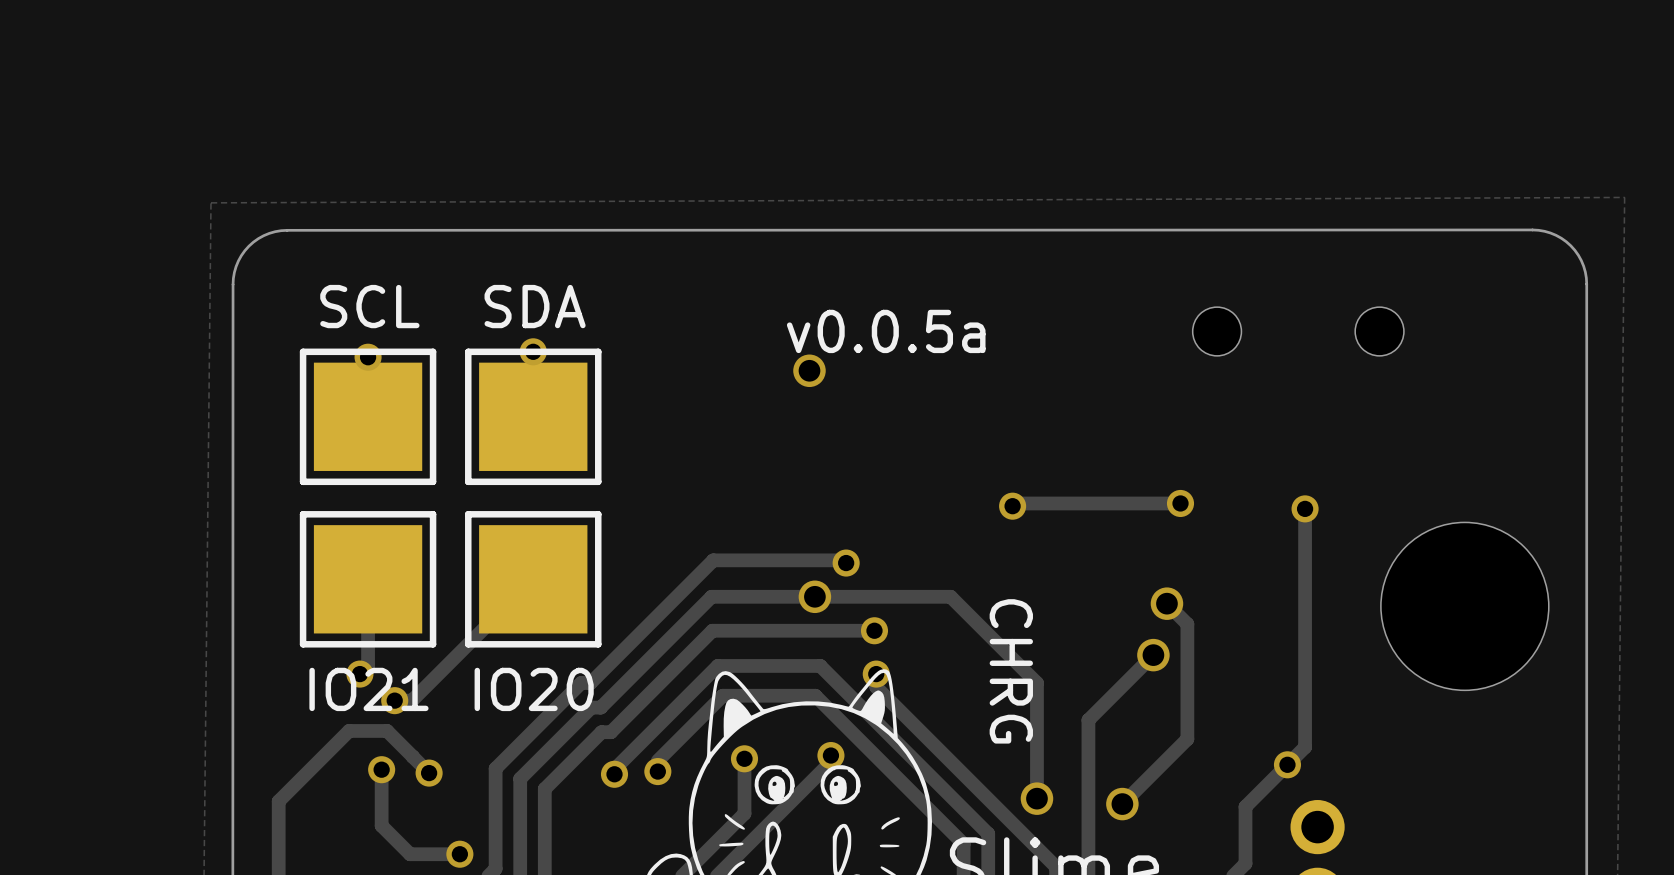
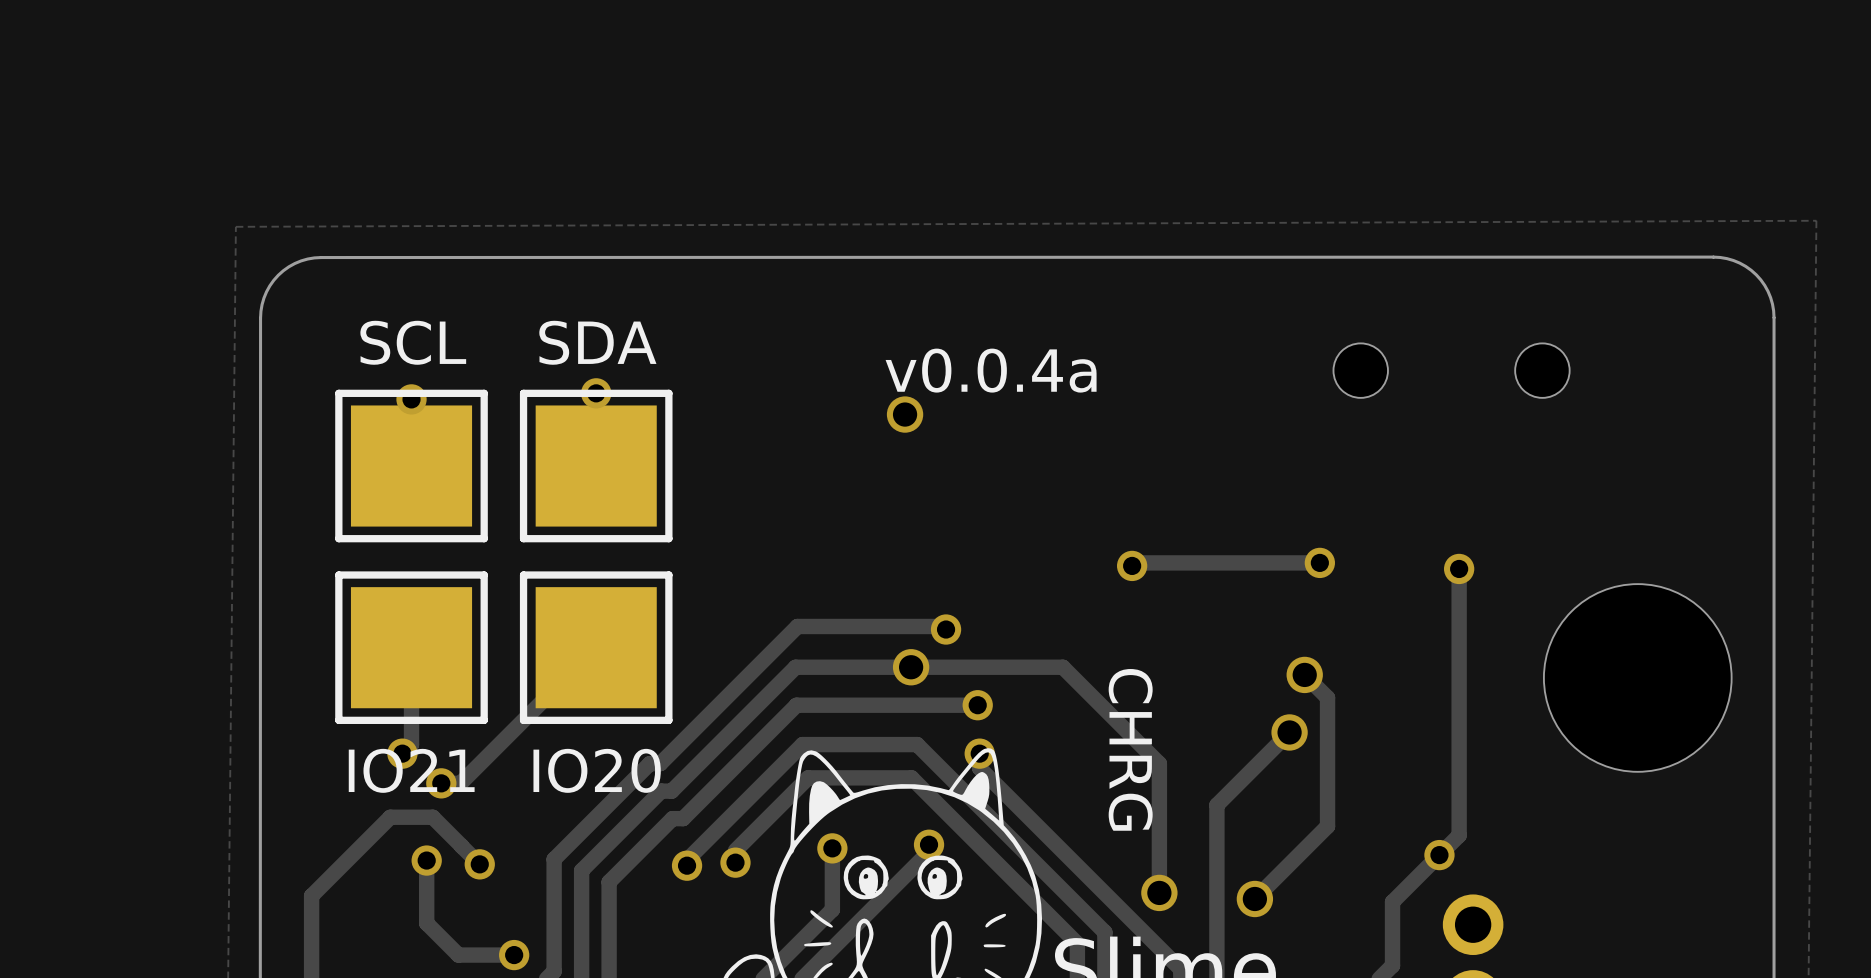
text: v0.0.5a (886, 331) -> v0.0.4a (991, 370)

